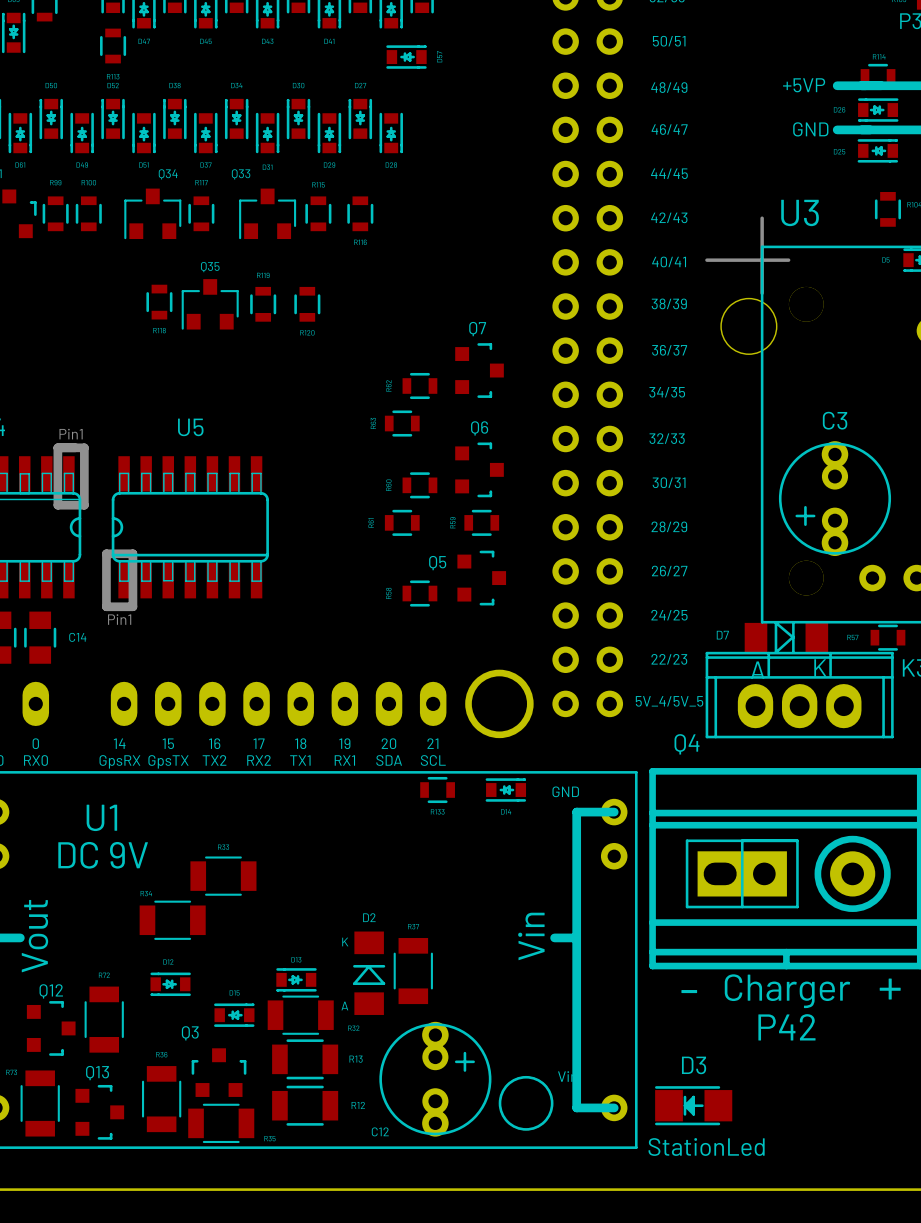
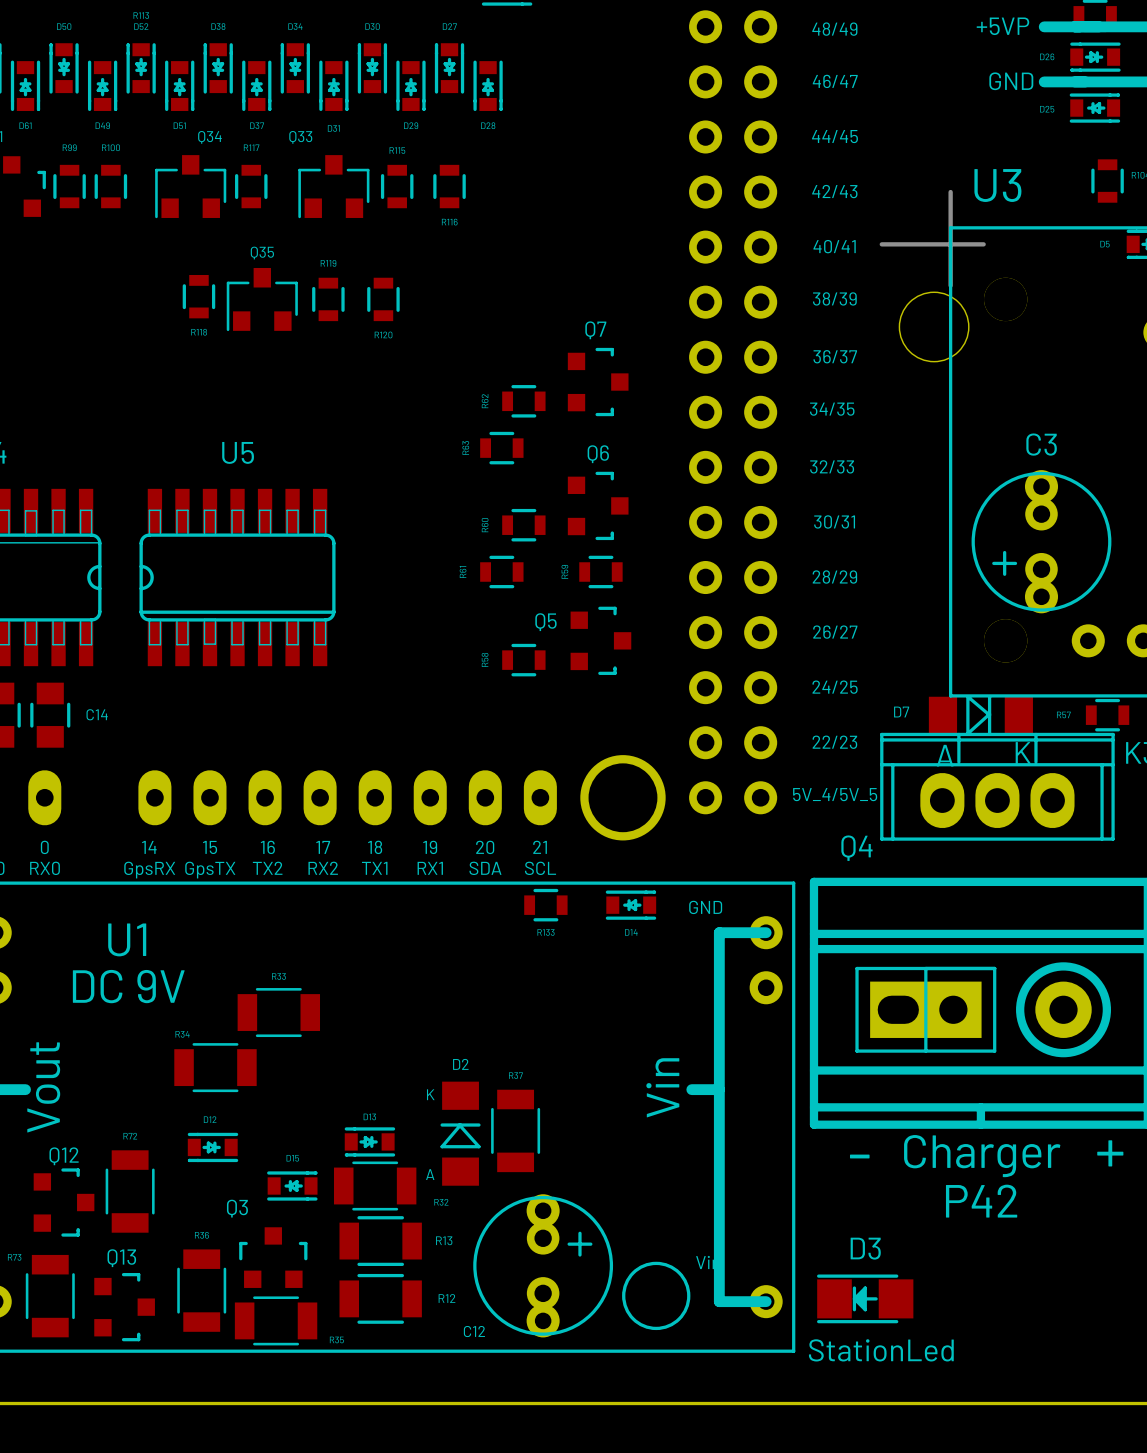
text: Pin1 (71, 434) -> none
line: (57, 447) (84, 447) (84, 505) (57, 505) (57, 447) -> none
line: (106, 553) (132, 553) (132, 606) (106, 606) (106, 553) -> none
text: Pin1 (119, 619) -> none

